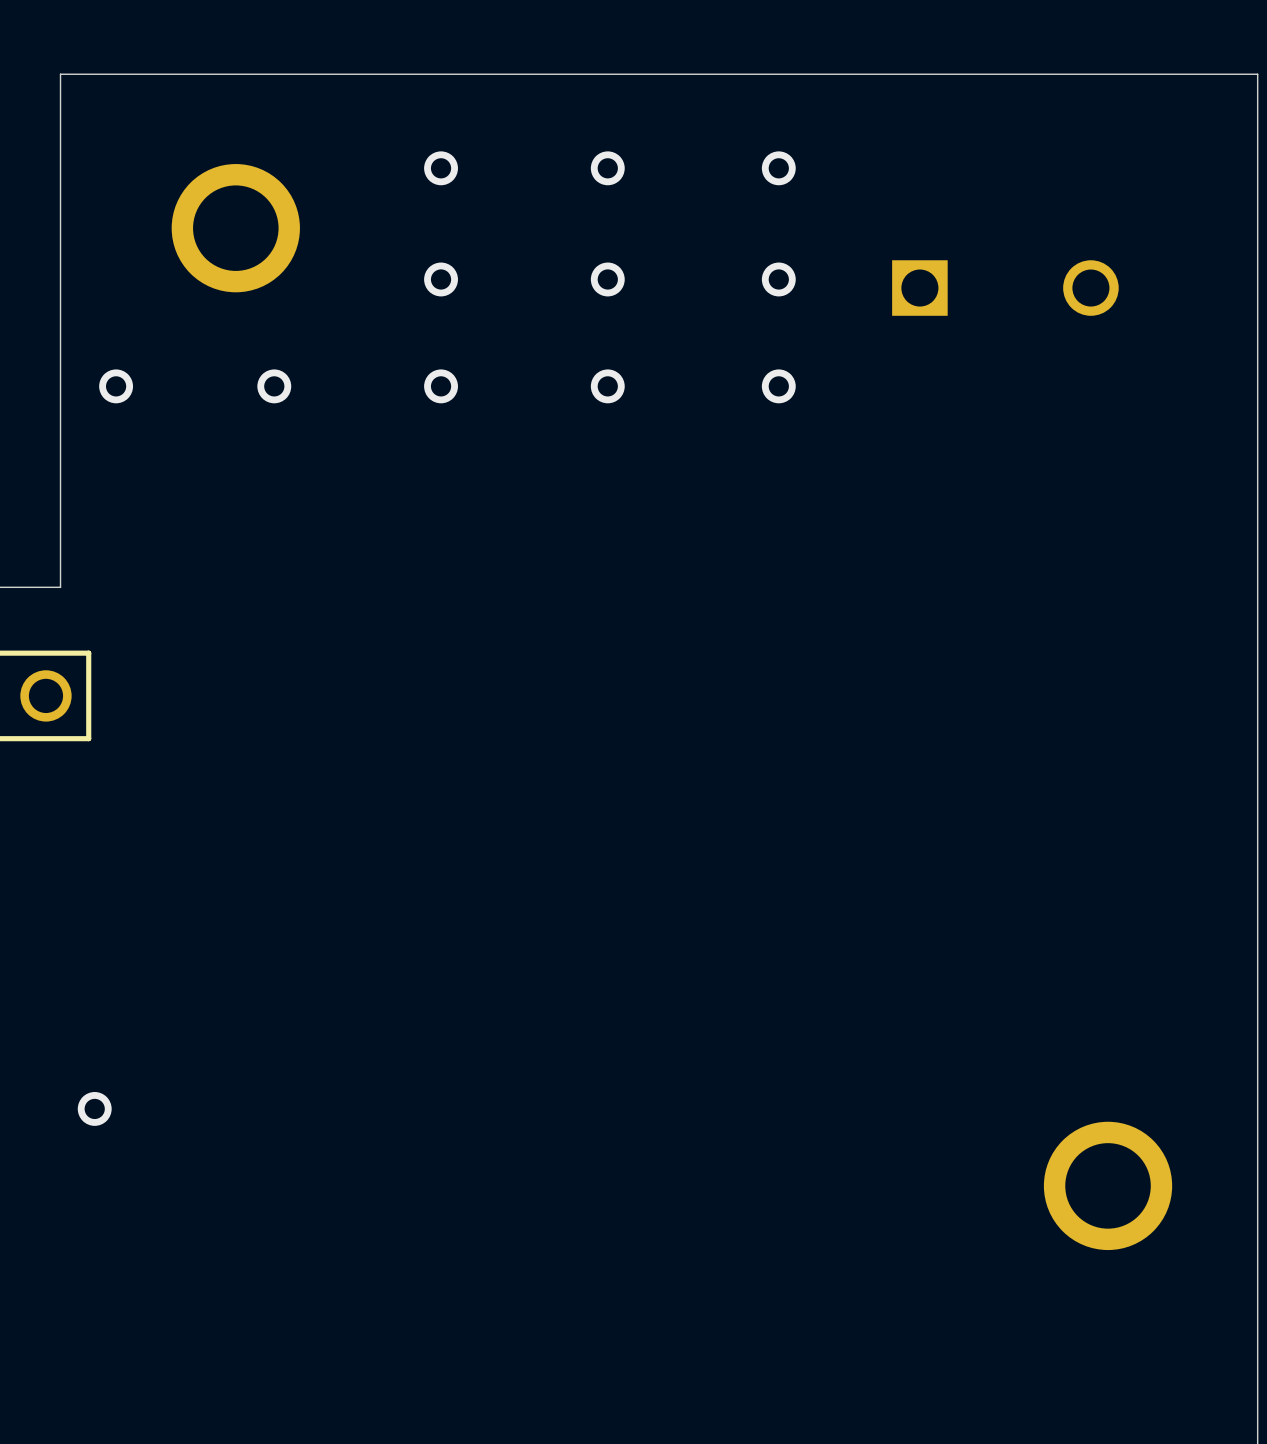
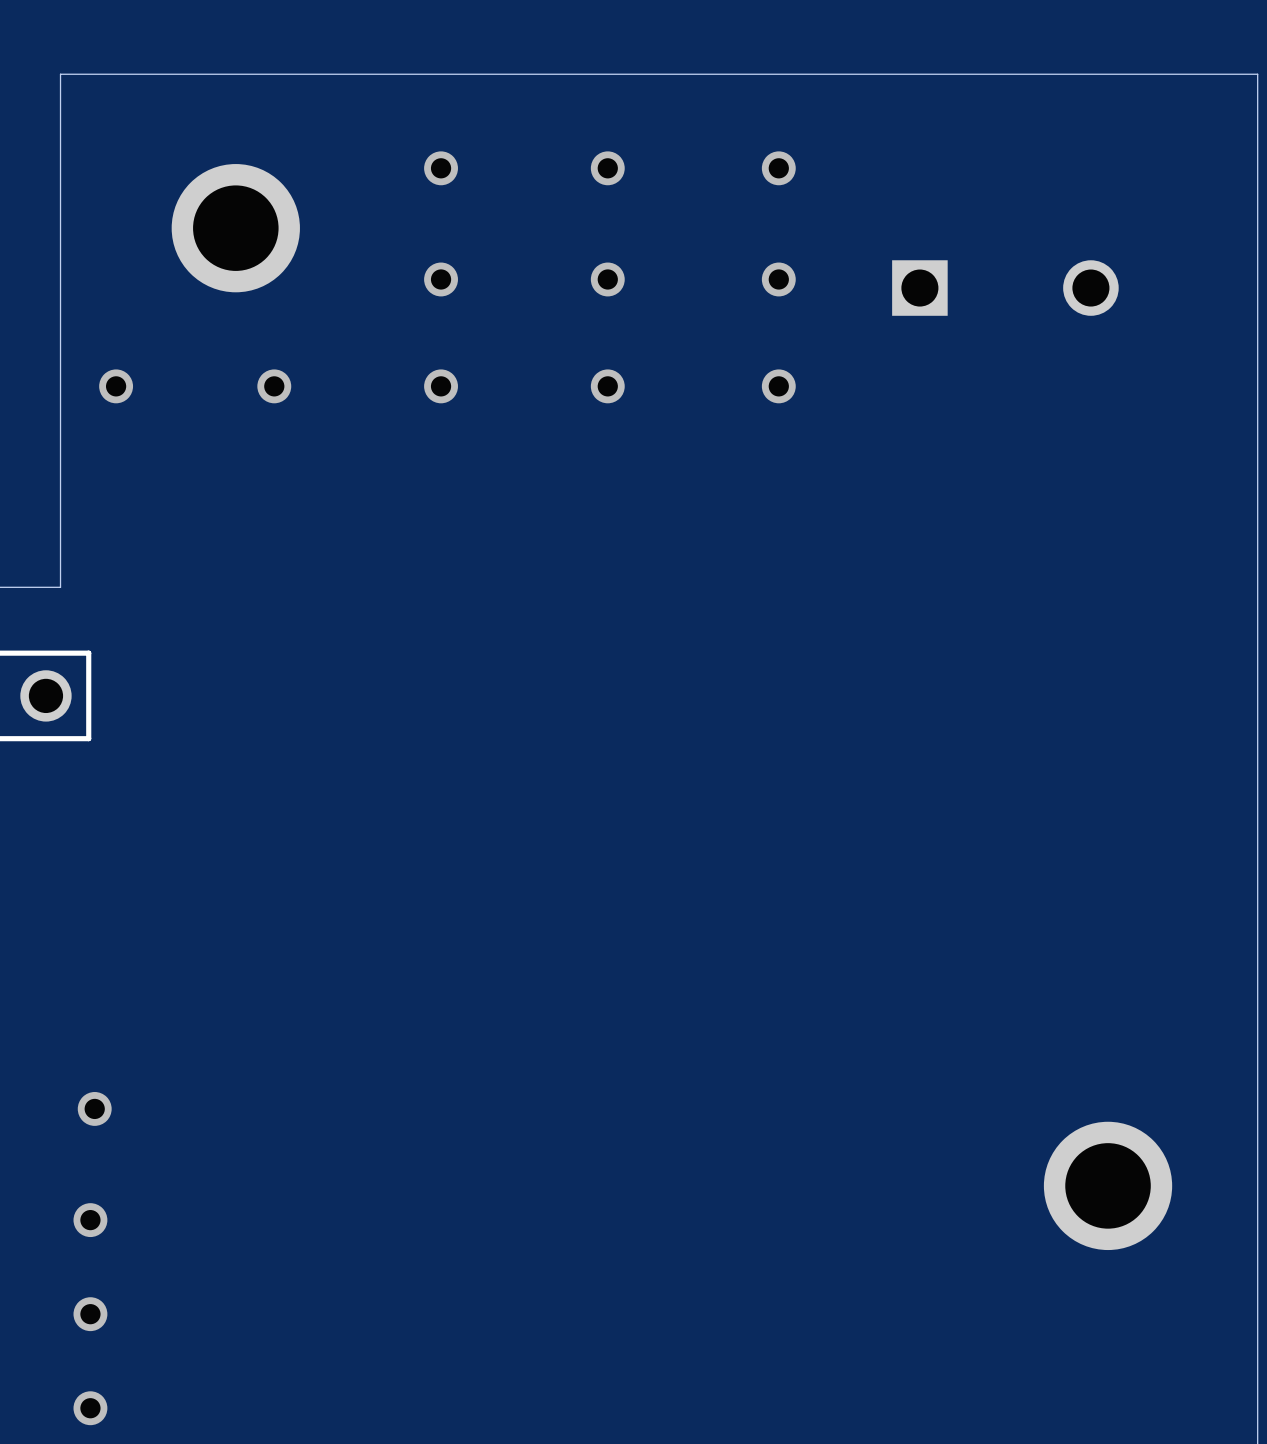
via: none -> (90, 1220)
via: none -> (90, 1314)
via: none -> (90, 1408)

